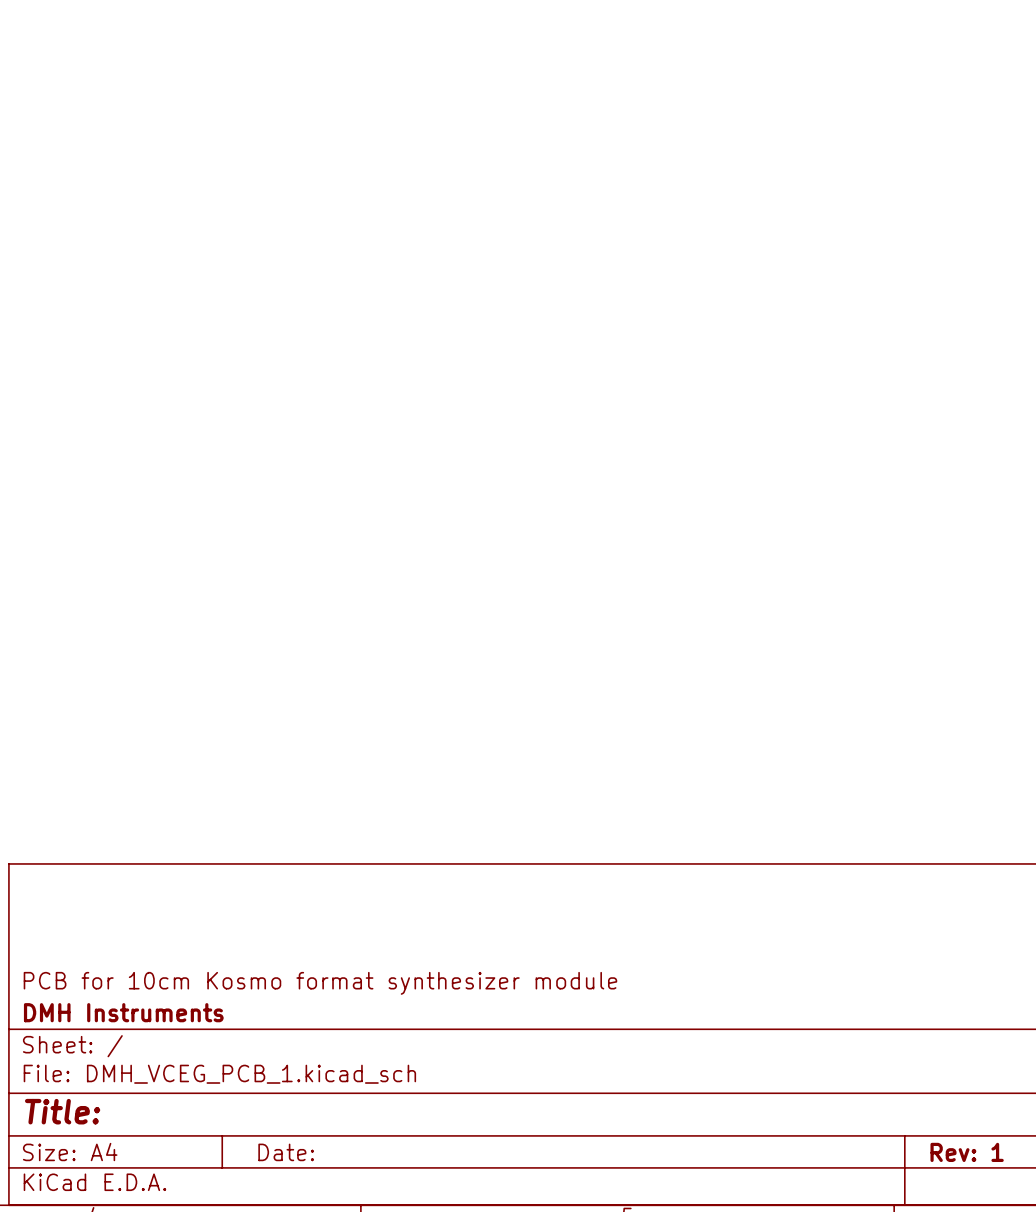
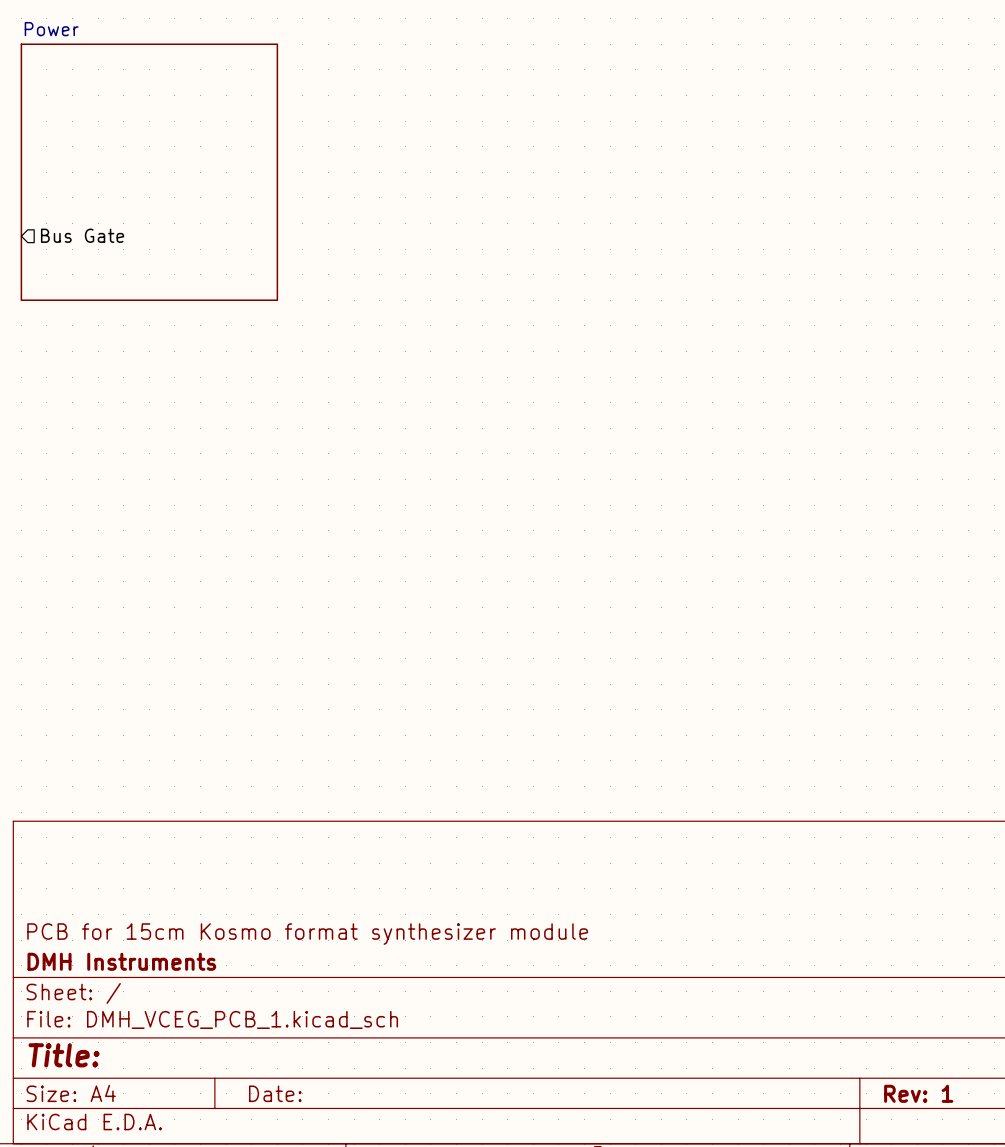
sheet Power: none -> (149, 172)
sheet pin: none -> Bus Gate (82, 235)
title block: PCB for 10cm Kosmo format synthesizer module (320, 983) -> PCB for 15cm Kosmo format synthesizer module (307, 934)

